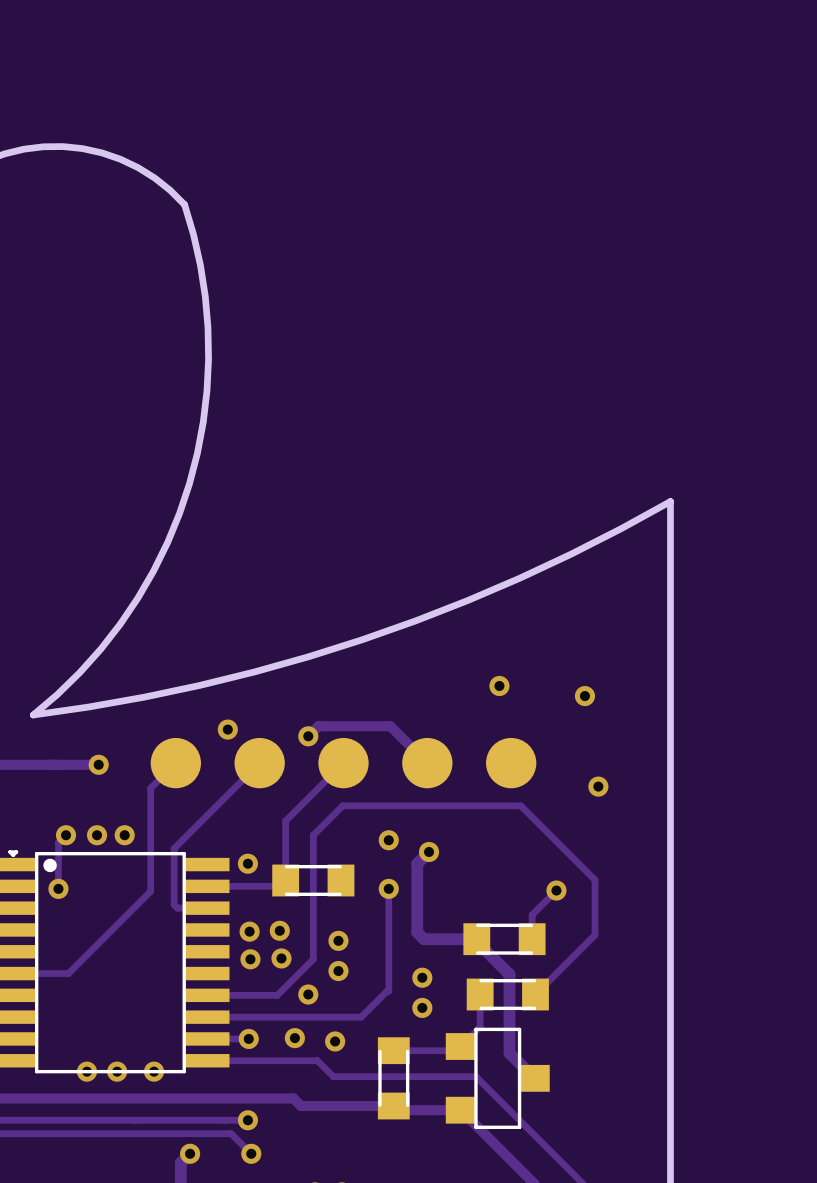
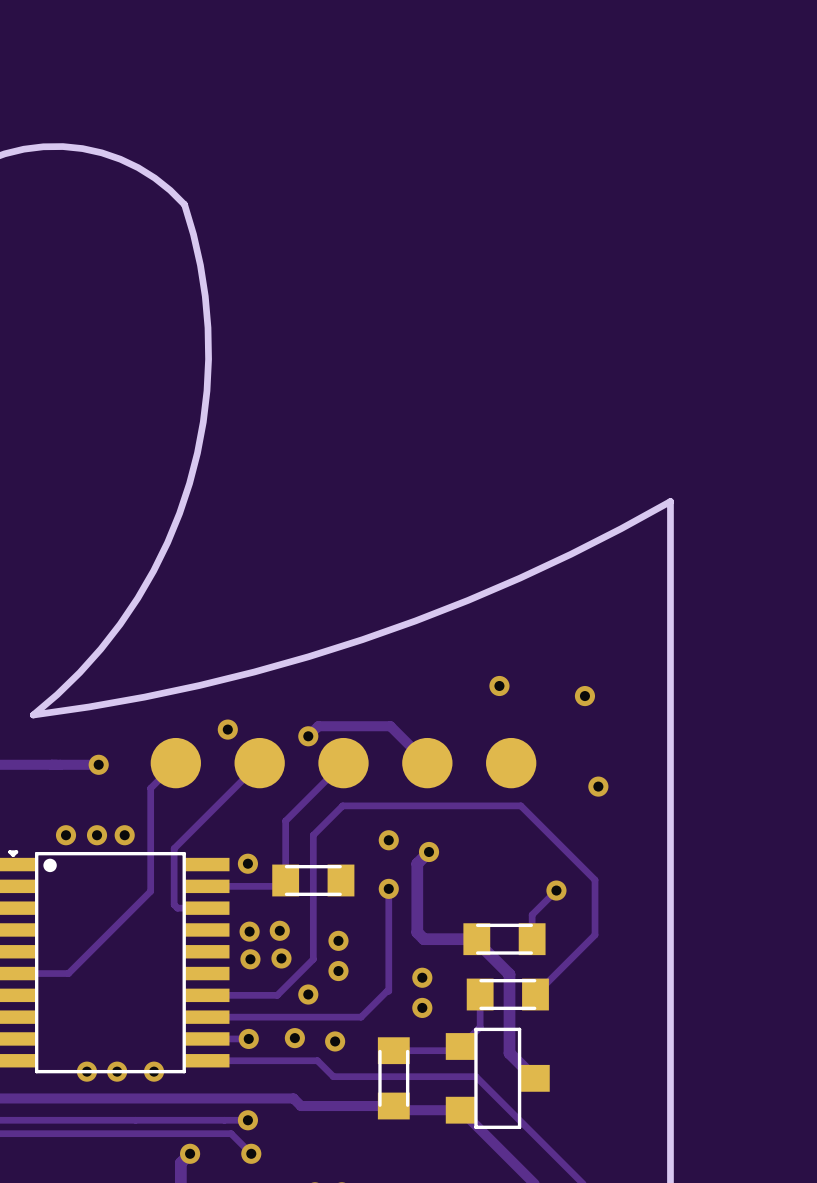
track: (66, 835) (58, 842) (58, 888) -> none
via: (58, 888) -> none

